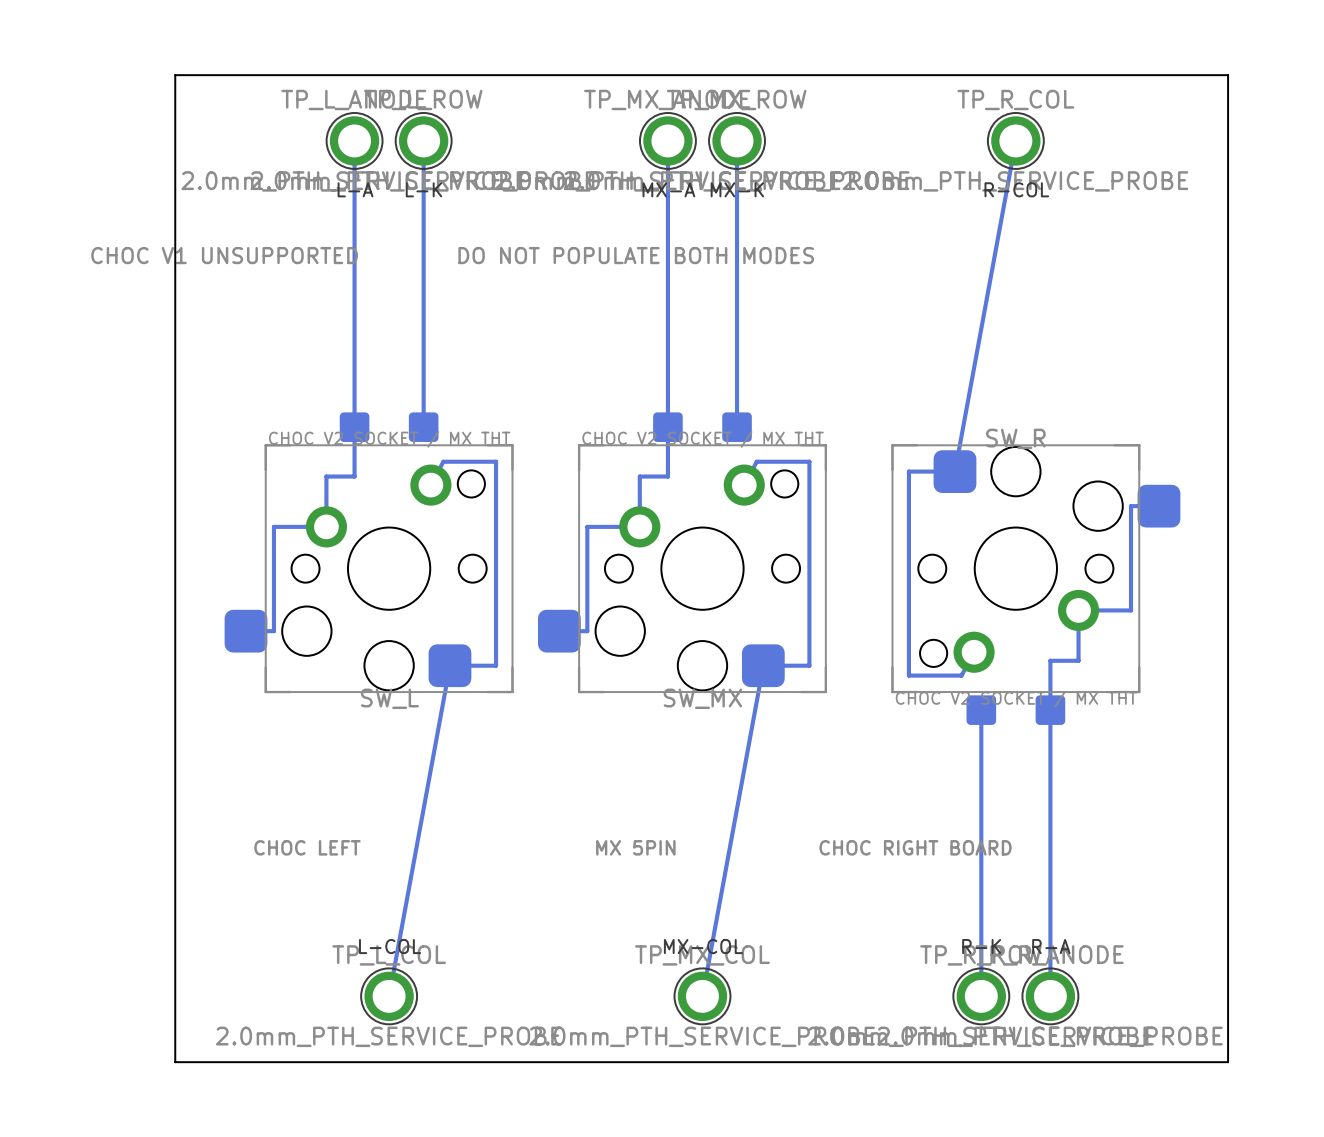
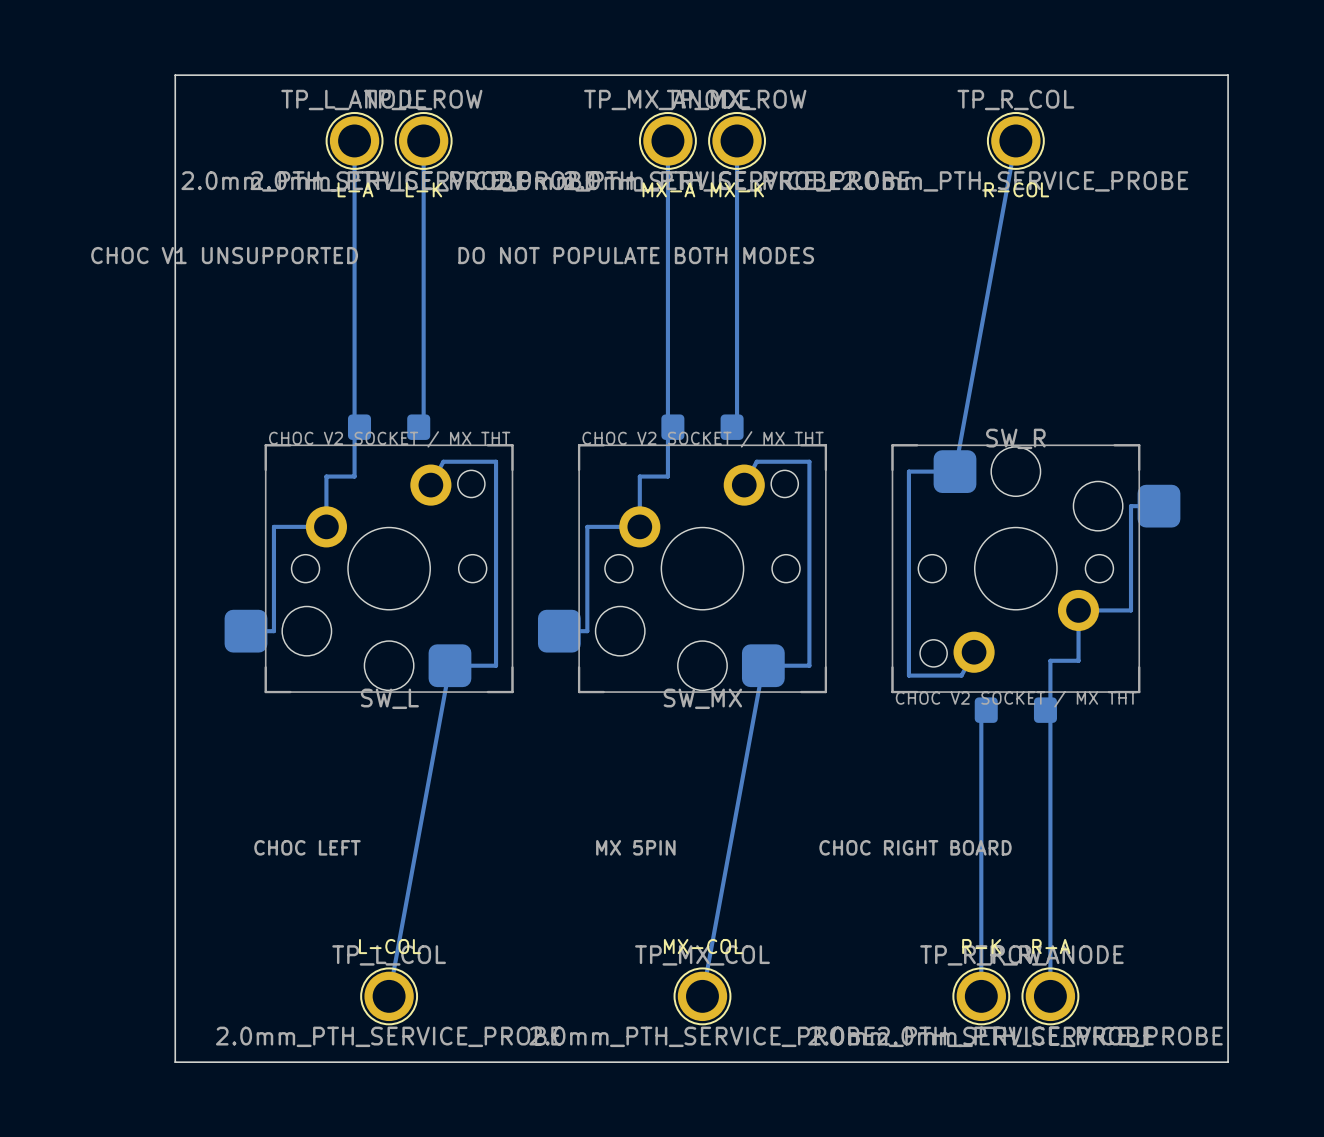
part footprint: [339, 412, 439, 442] -> [347, 414, 431, 440]
part footprint: [653, 412, 752, 442] -> [661, 414, 744, 440]
part footprint: [966, 695, 1066, 725] -> [974, 697, 1057, 723]

